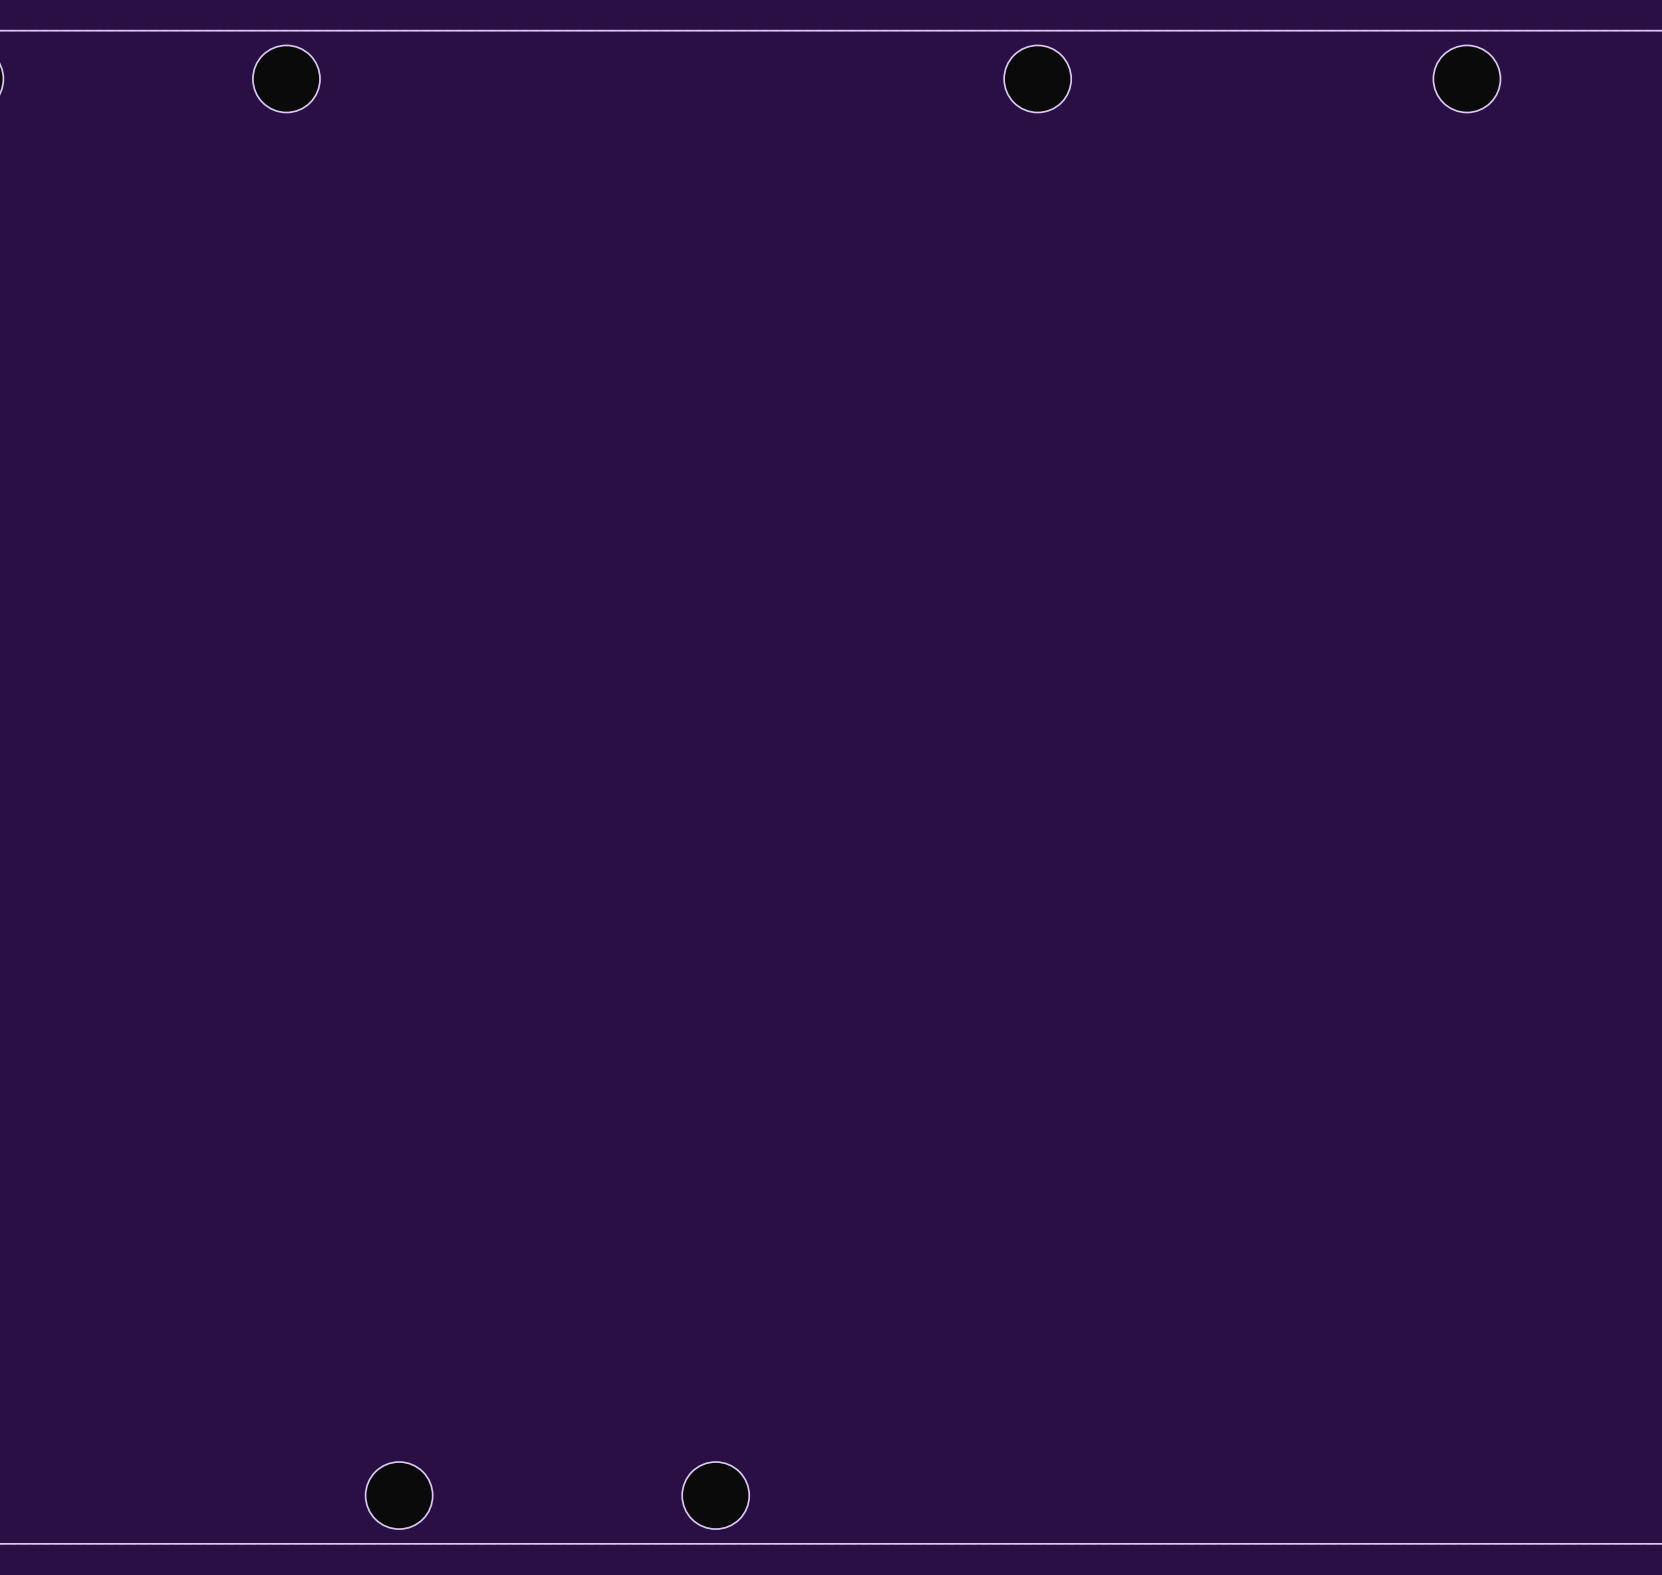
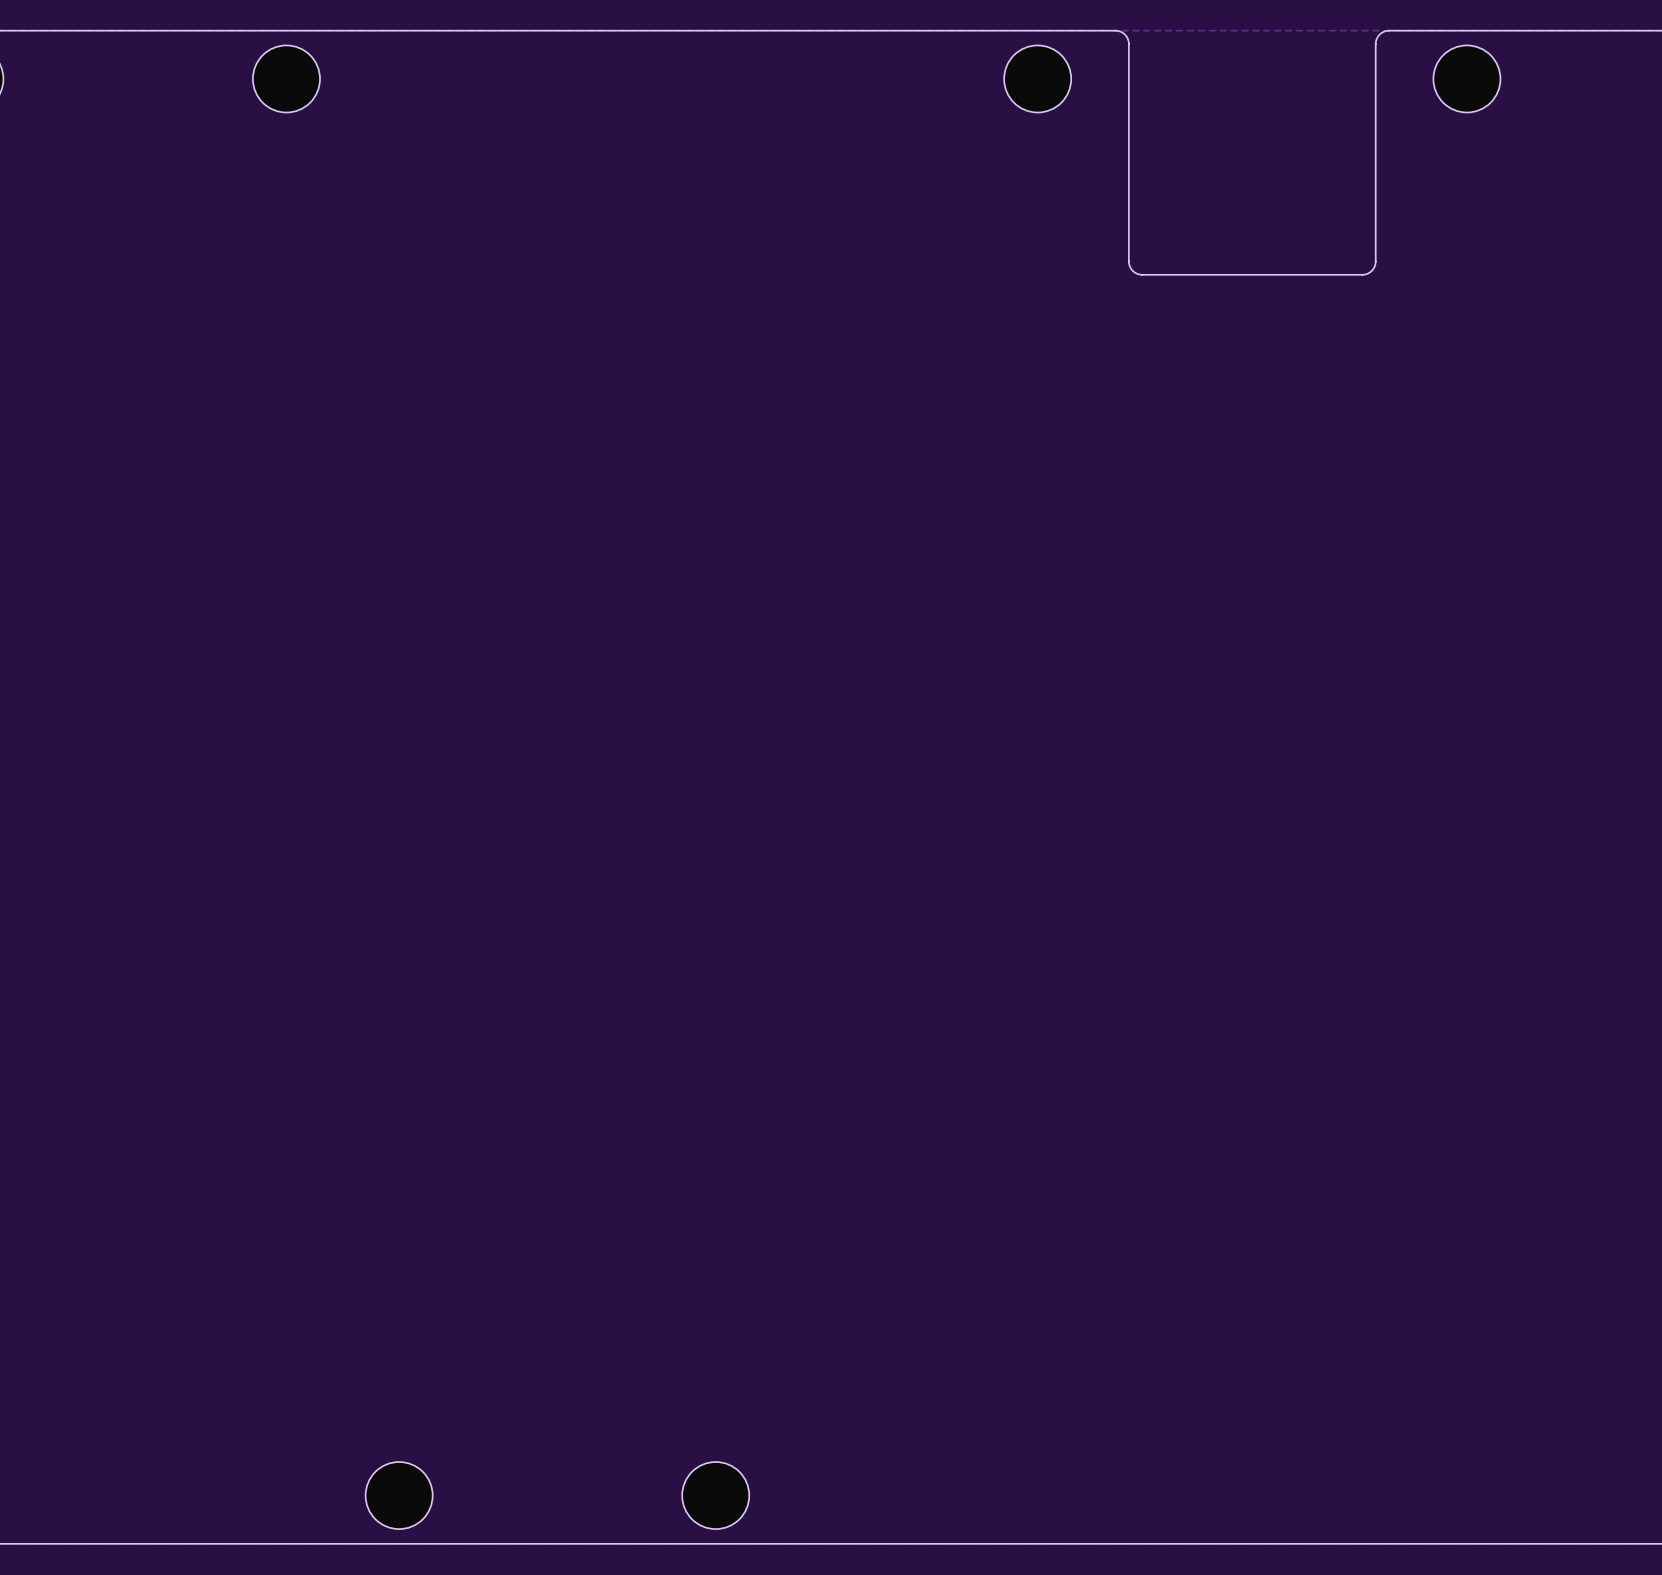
board edge: (1389, 30) (1115, 30) -> (1389, 30) (1380, 33) (1375, 42) (1375, 262) (1371, 270) (1362, 274) (1142, 274) (1132, 270) (1128, 261) (1128, 42) (1123, 33) (1115, 30)

